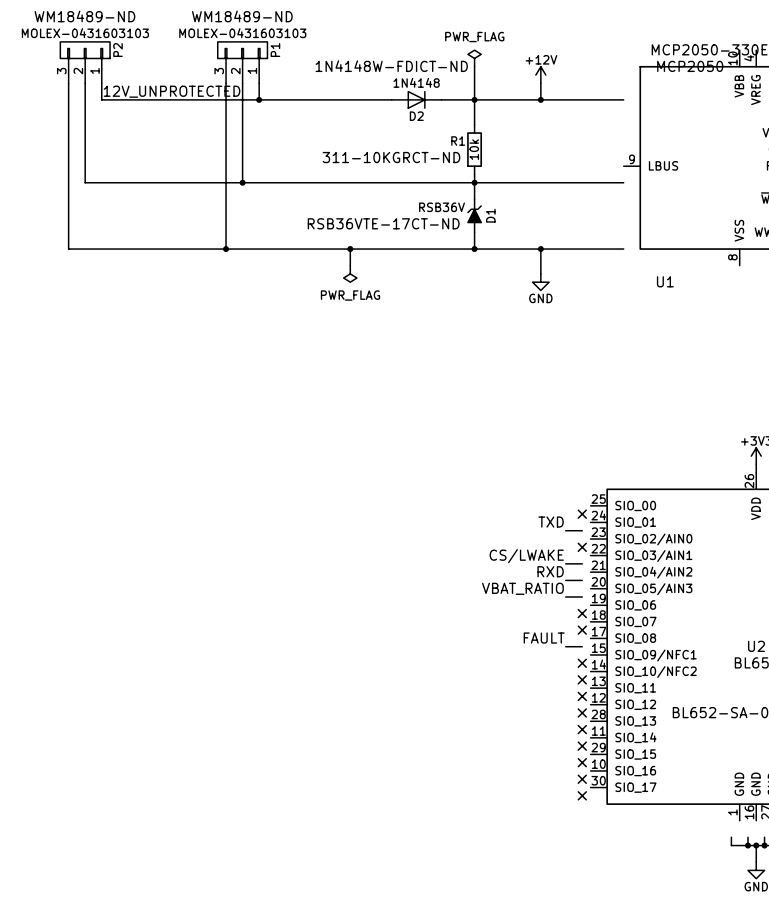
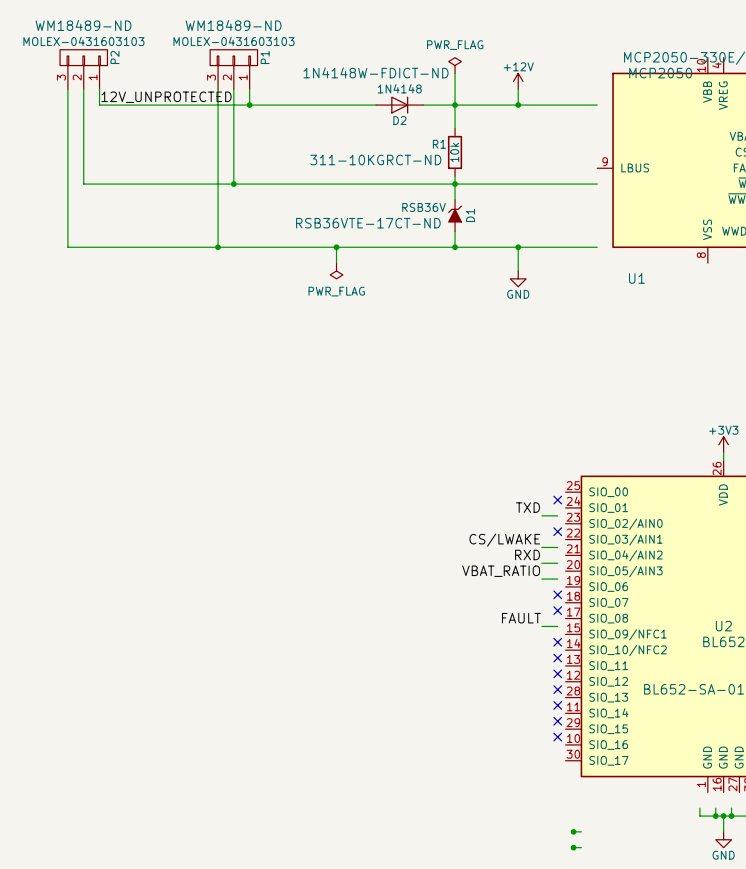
no-connect mark: (582, 779) -> none
no-connect mark: (582, 795) -> none
wire: none -> (573, 831) (581, 831)
junction: none -> (573, 831)
wire: none -> (573, 847) (581, 847)
junction: none -> (573, 847)

